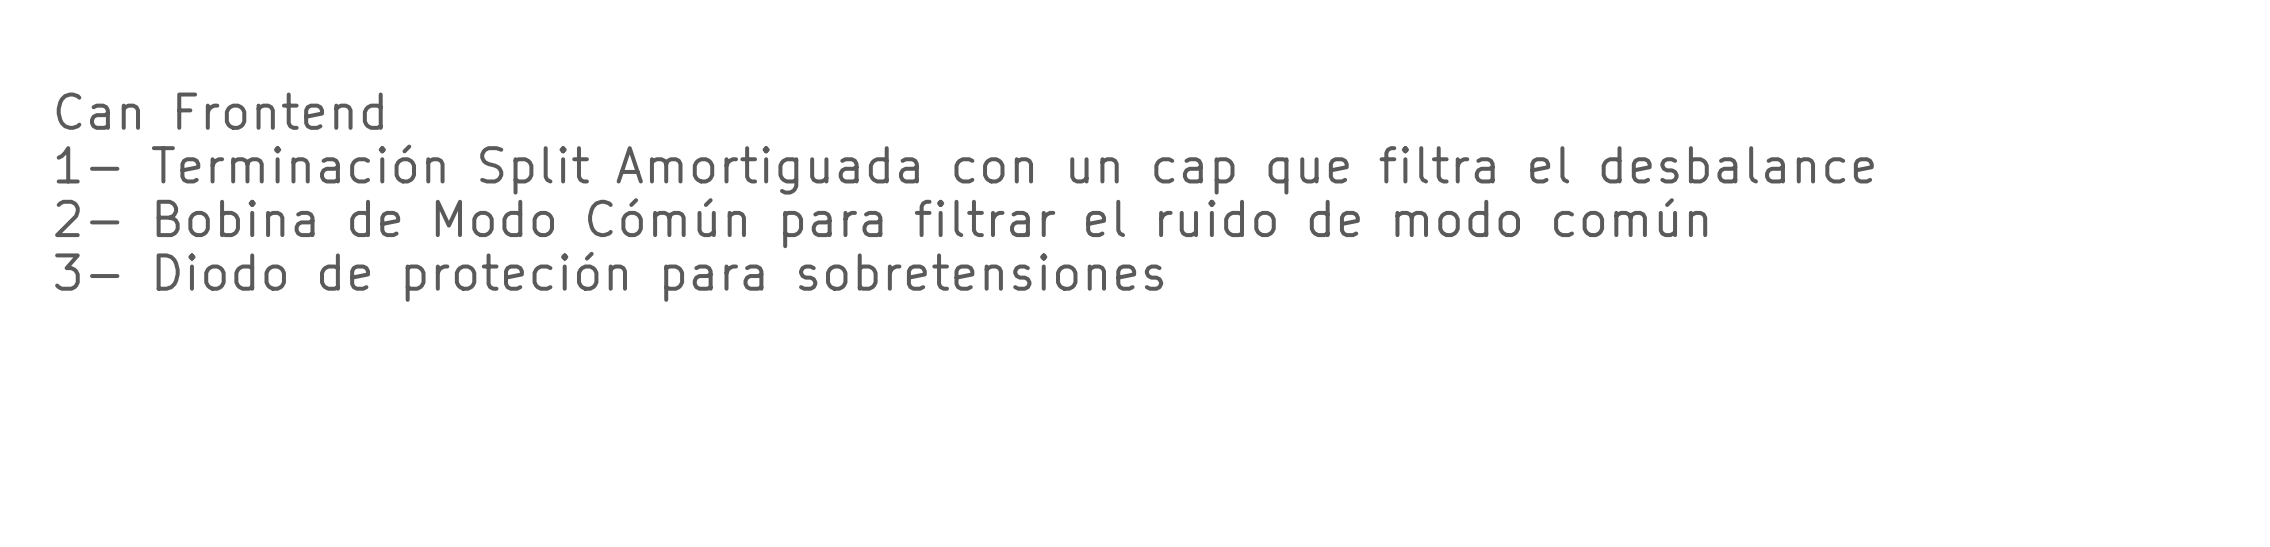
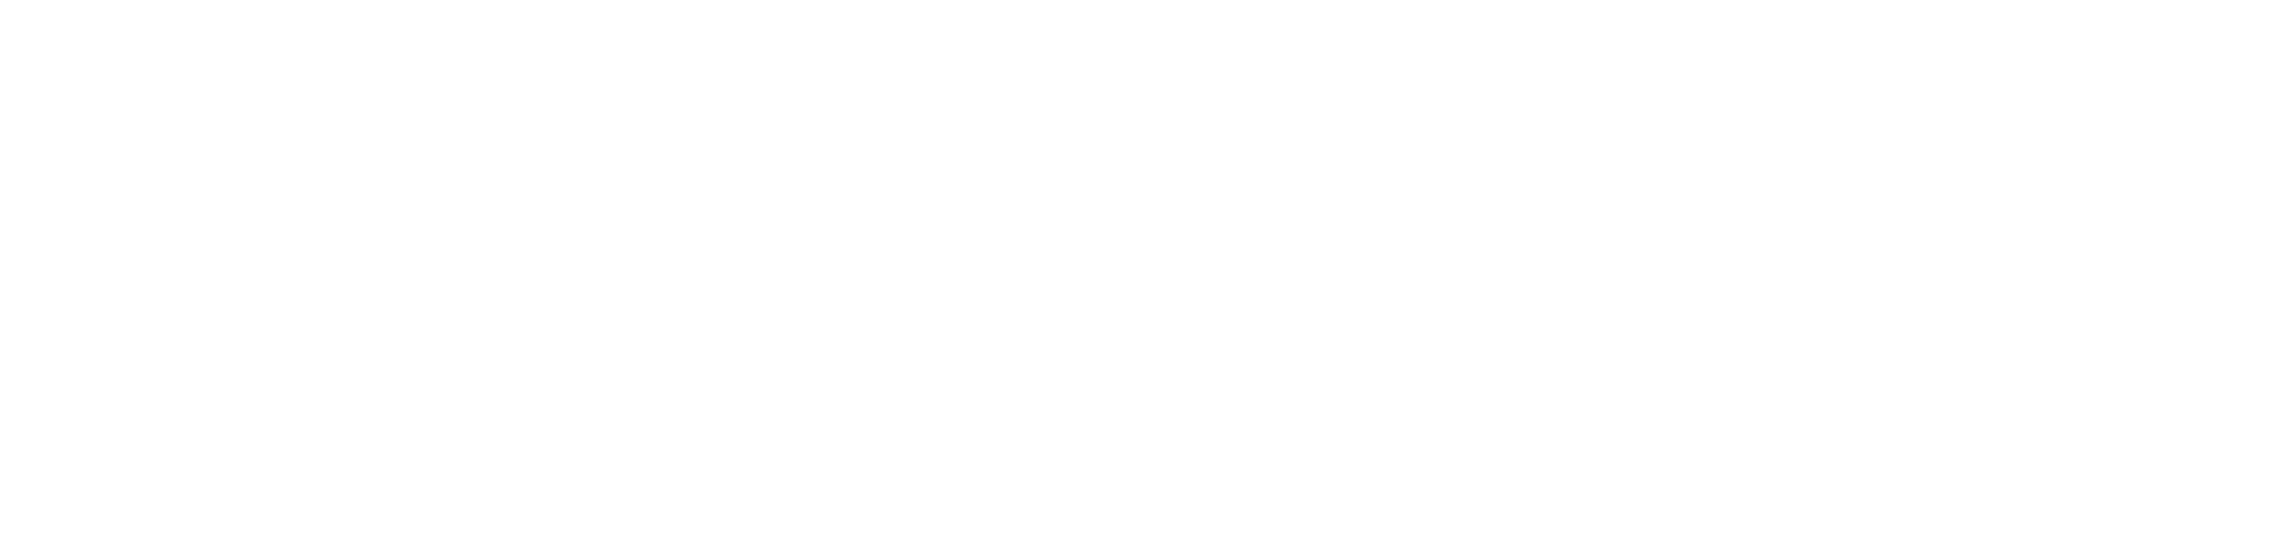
text: Can Frontend (219, 111) -> none
text: 1- Terminación Split Amortiguada con un cap que filtra el desbalance (965, 169) -> none
text: 2- Bobina de Modo Cómún para filtrar el ruido de modo común (881, 223) -> none
text: 3- Diodo de proteción para sobretensiones (609, 276) -> none

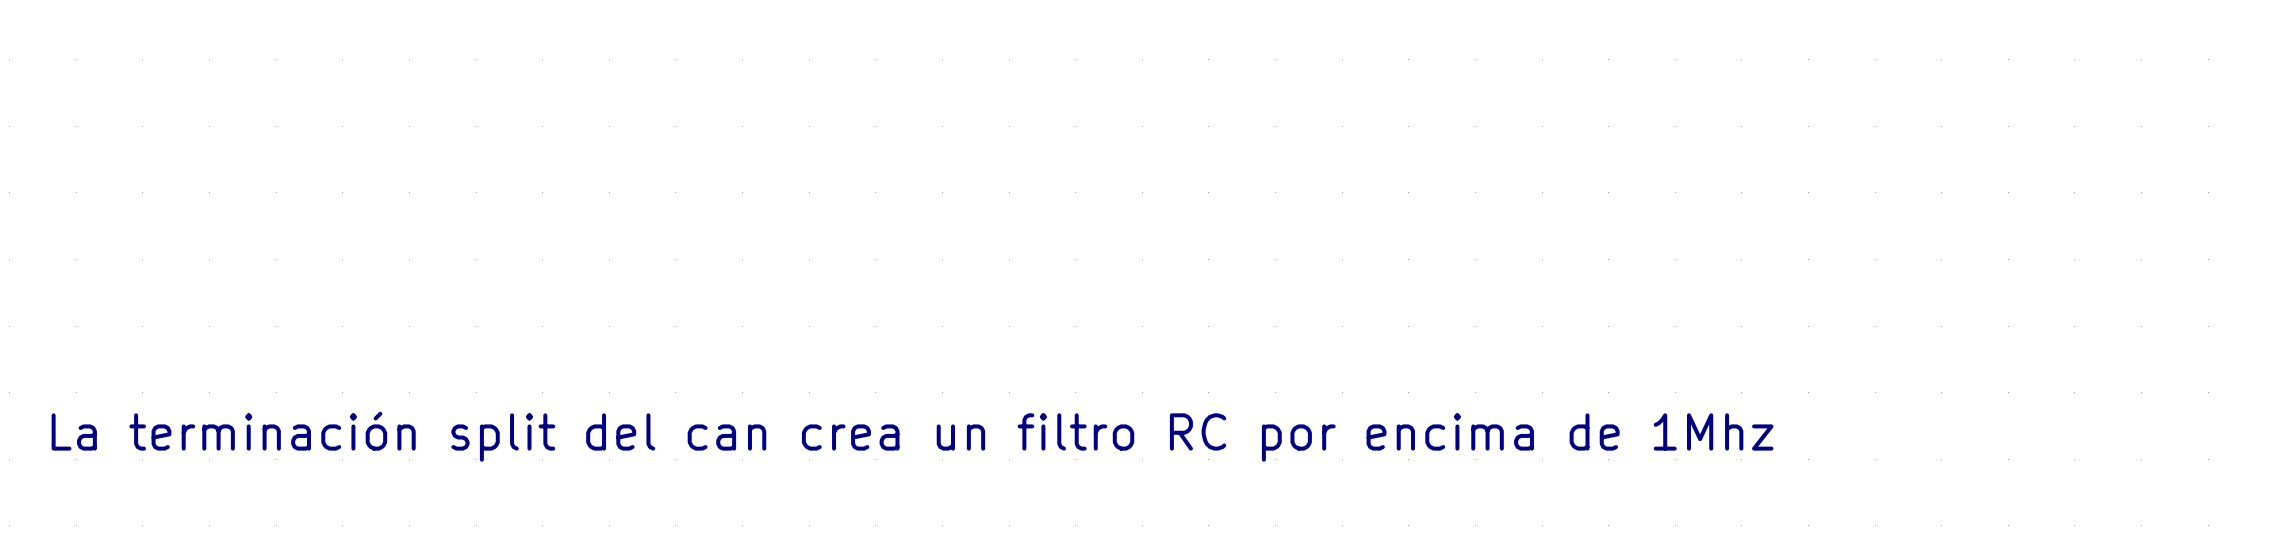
text: none -> La terminación split del can crea un filtro RC por encima de 1Mhz (912, 436)

